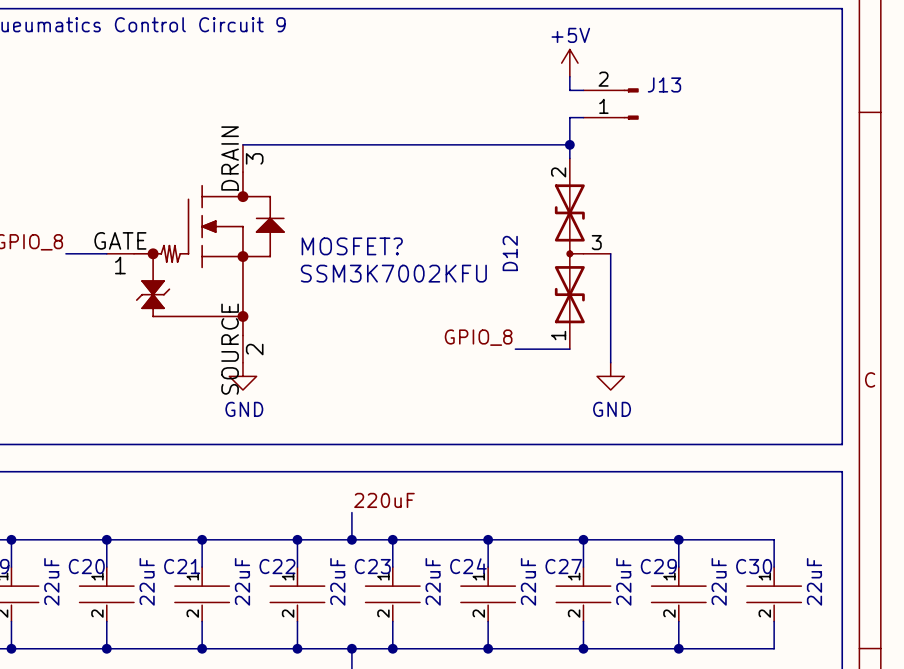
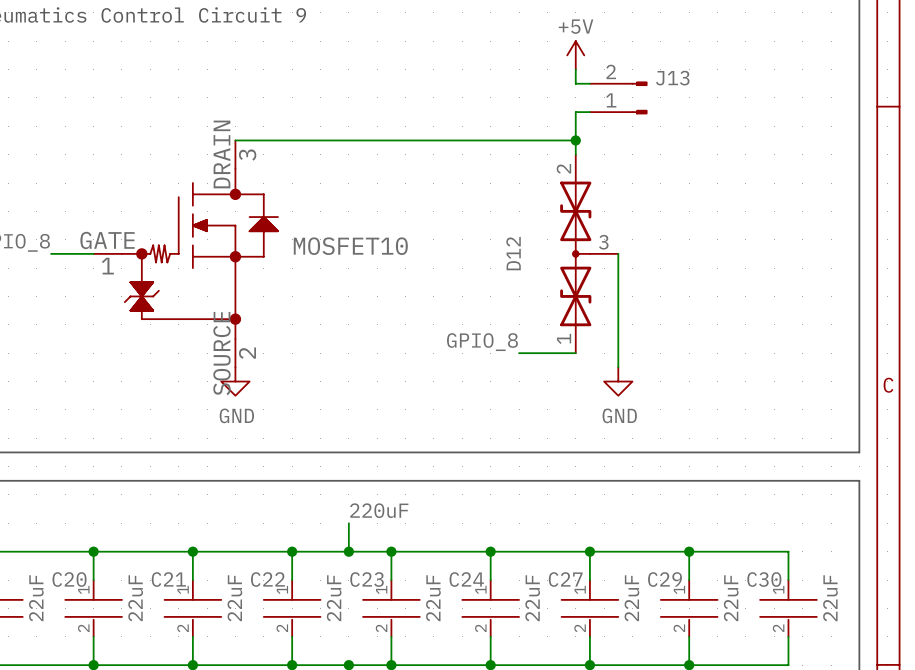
MOSFET? name: MOSFET? (352, 246) -> MOSFET10 (350, 246)
MOSFET? value: SSM3K7002KFU (393, 273) -> none

